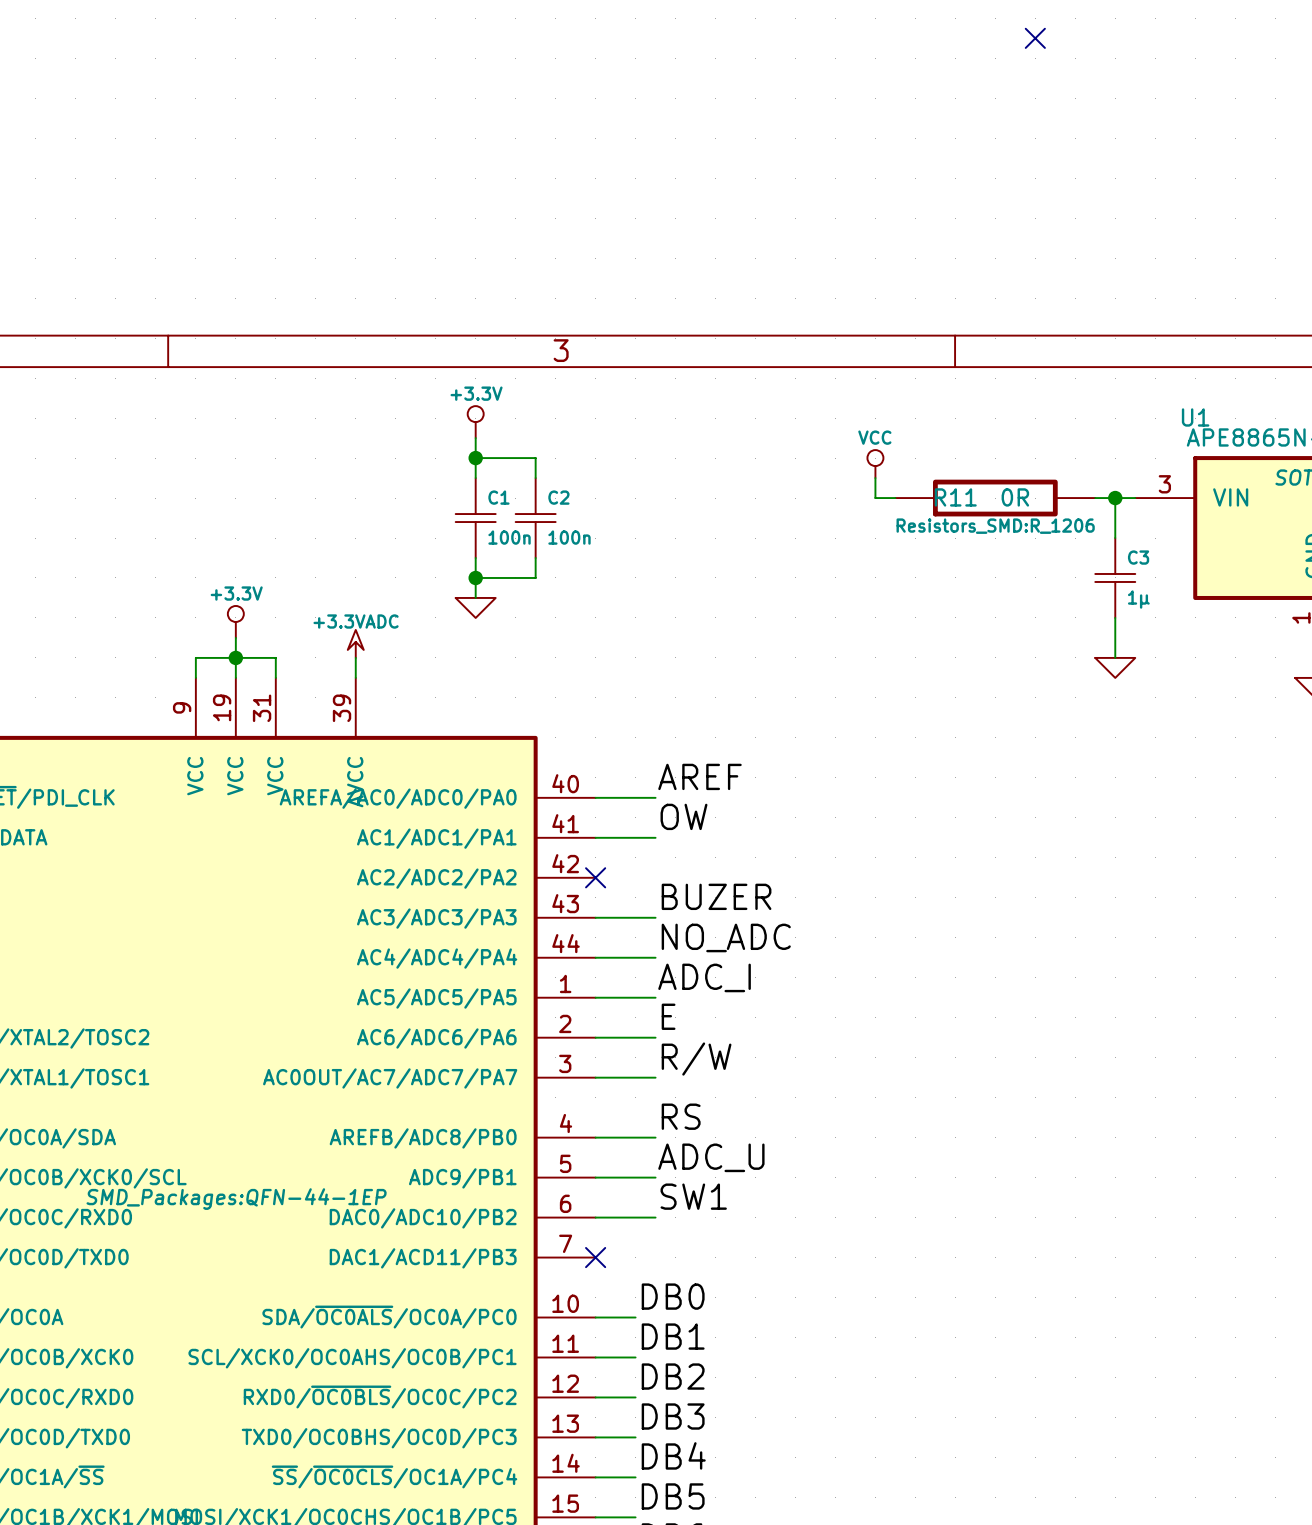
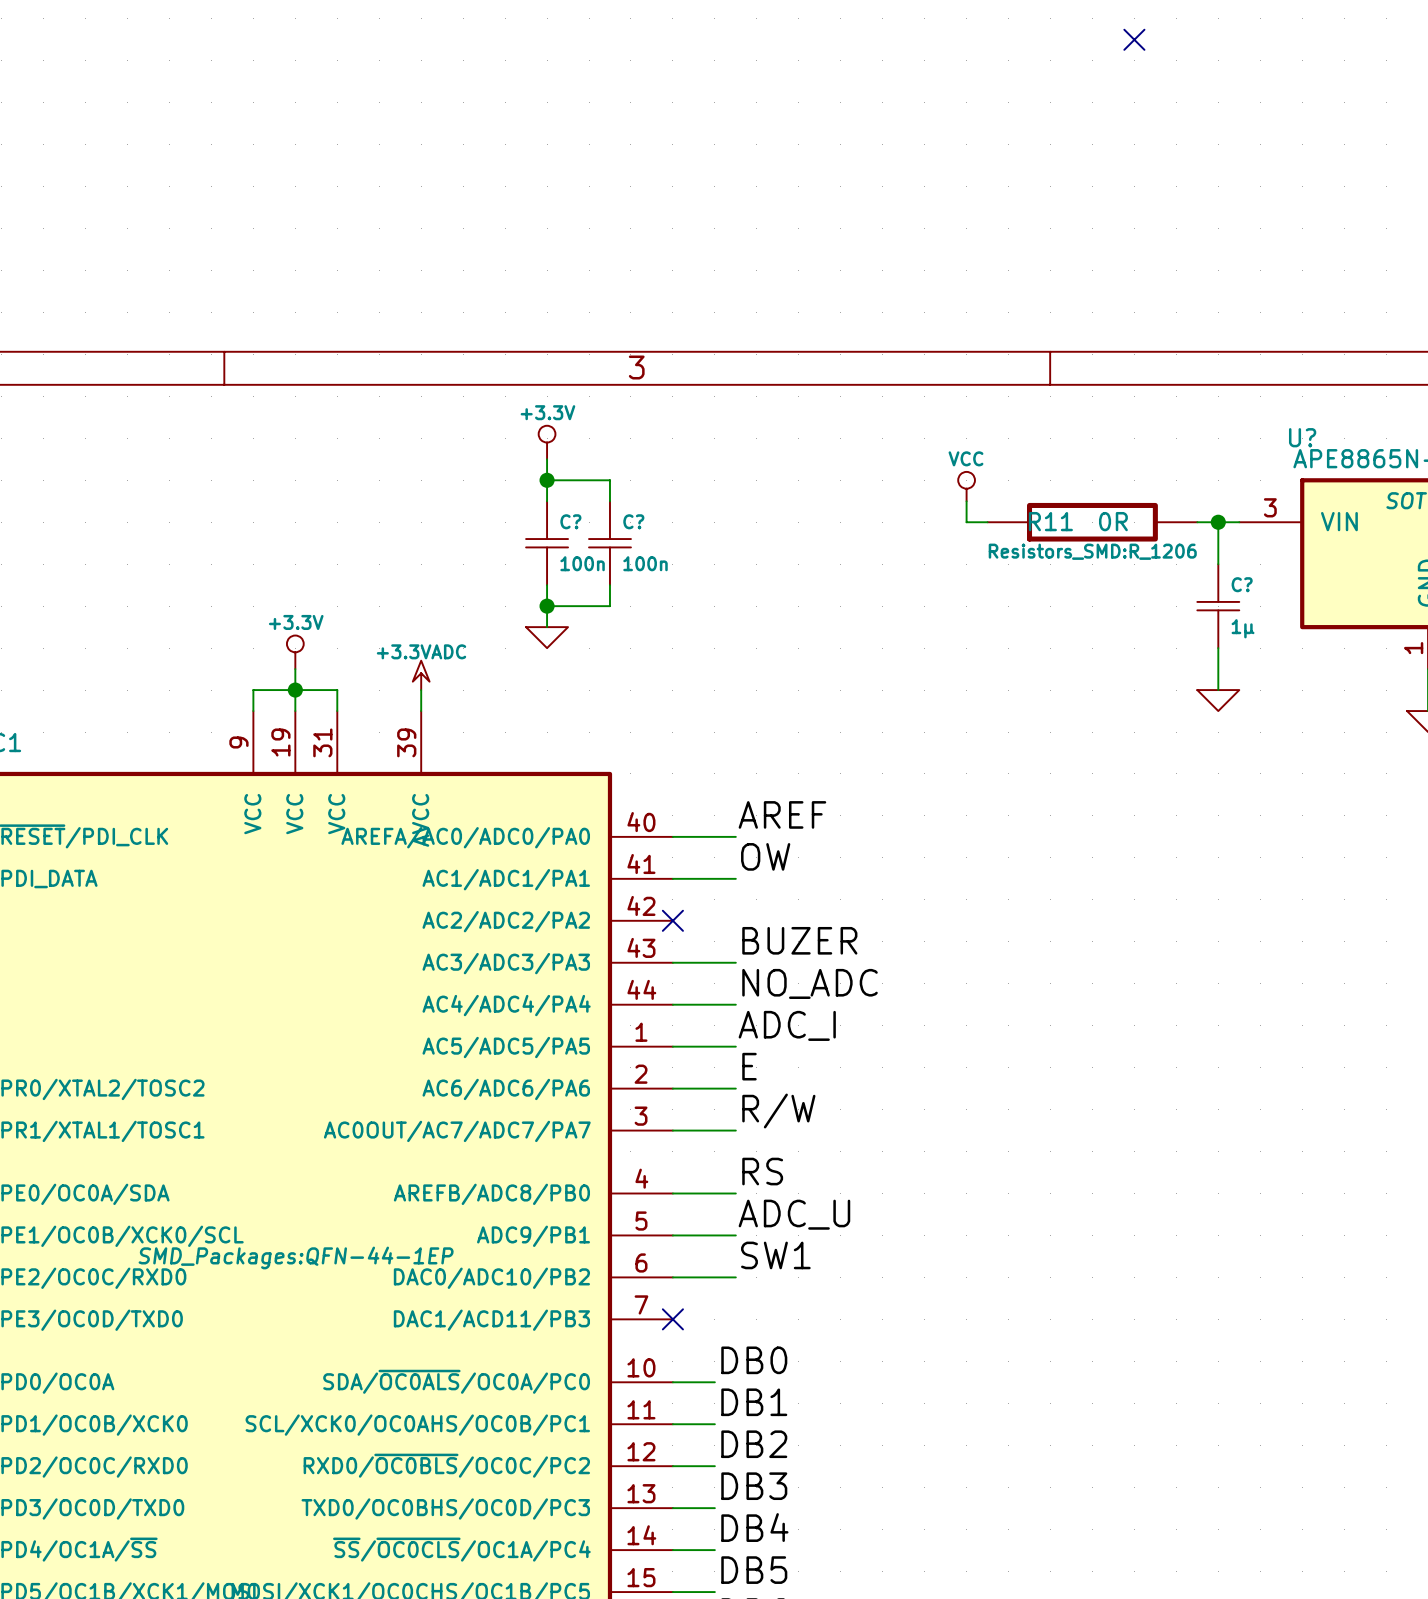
U1 name: U1 (1195, 417) -> U? (1302, 437)
C1 name: C1 (498, 497) -> C? (570, 521)
C2 name: C2 (558, 497) -> C? (633, 521)
C3 name: C3 (1138, 557) -> C? (1242, 584)

